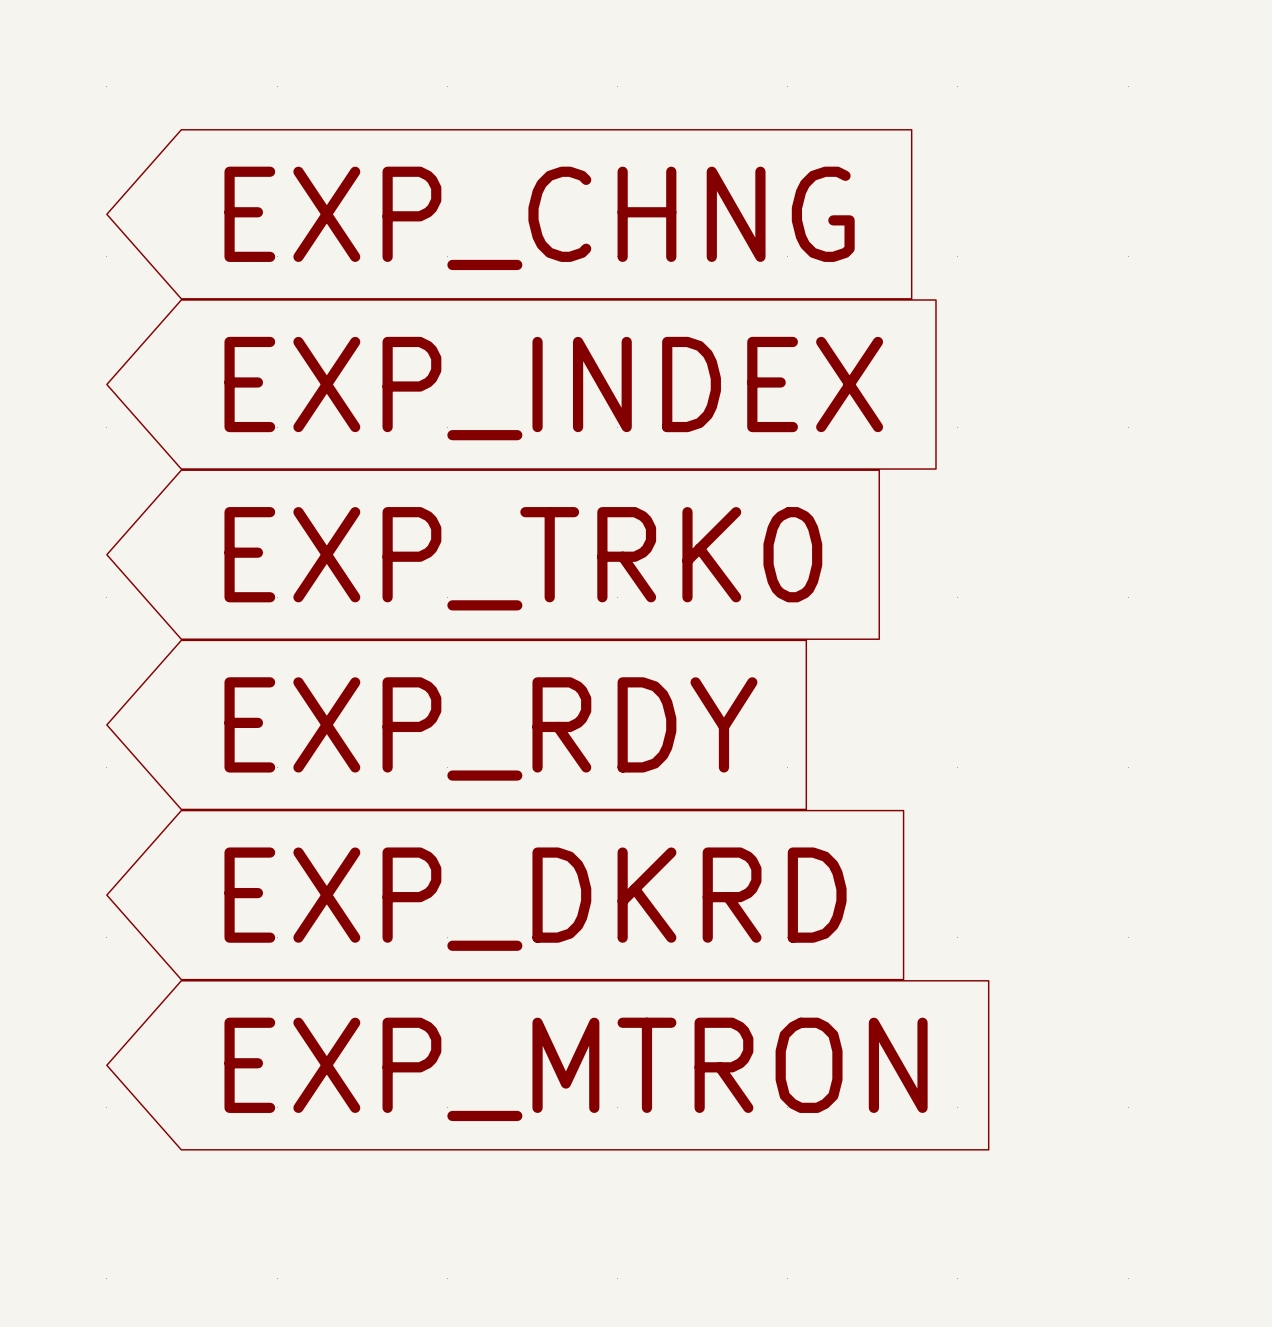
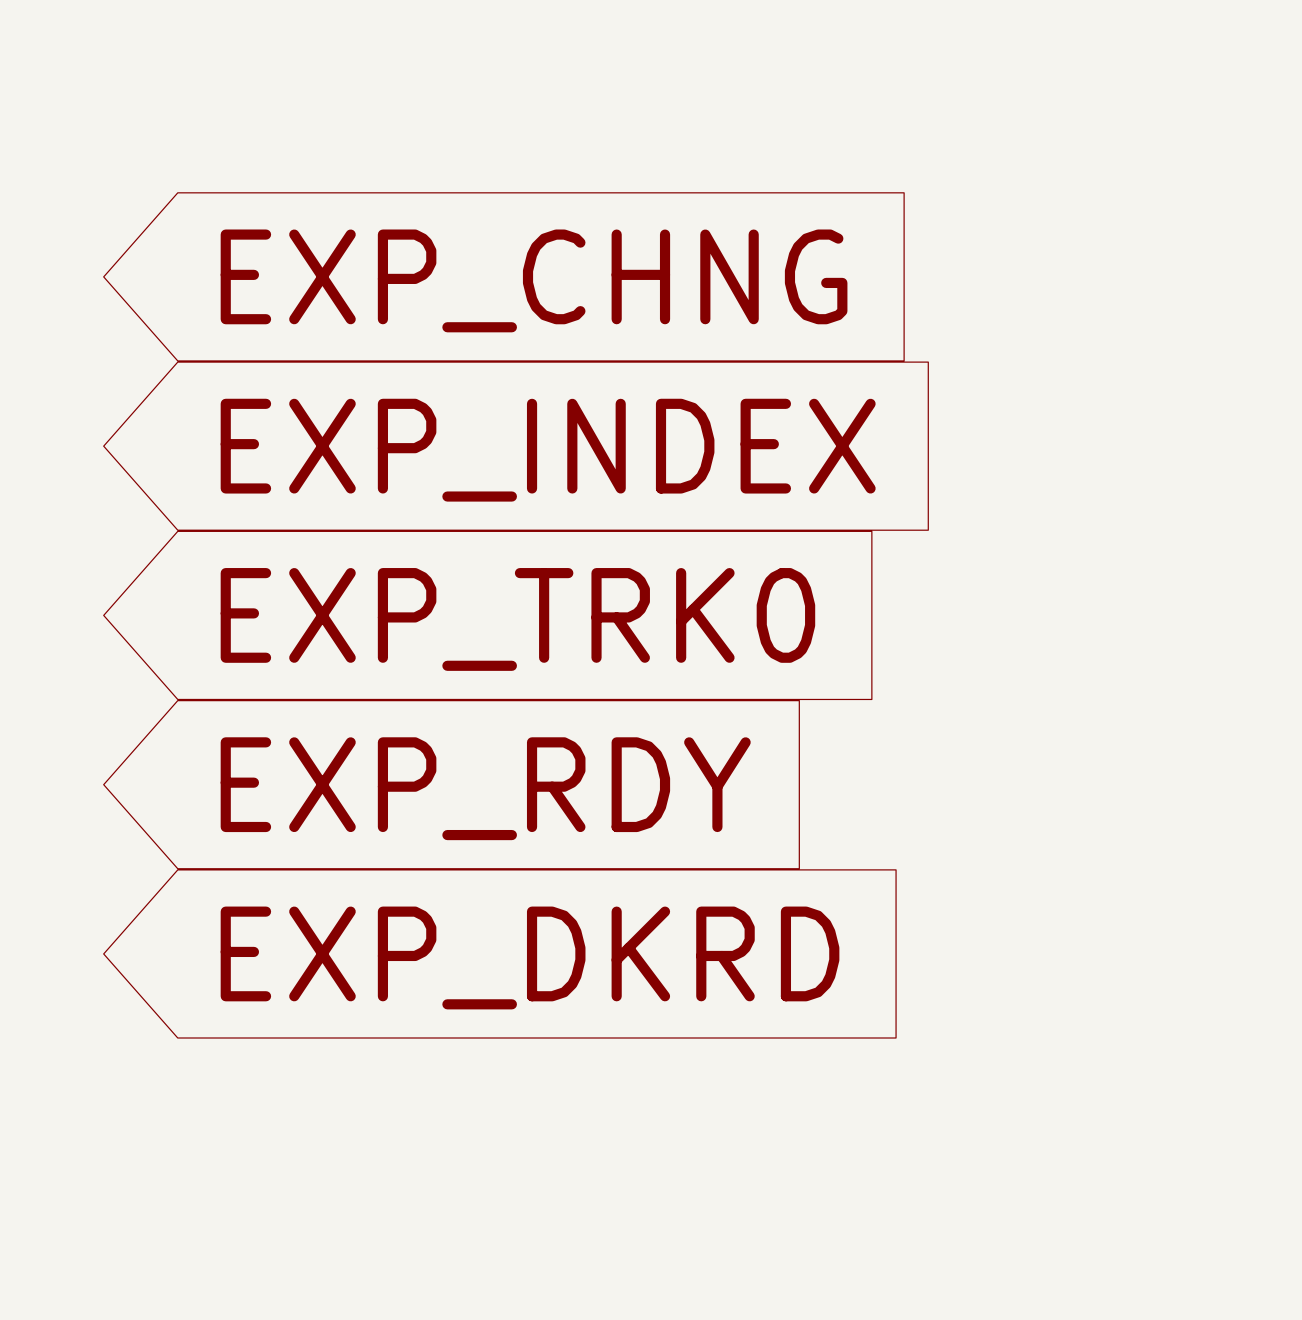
global label: EXP_MTRON (576, 1069) -> none

